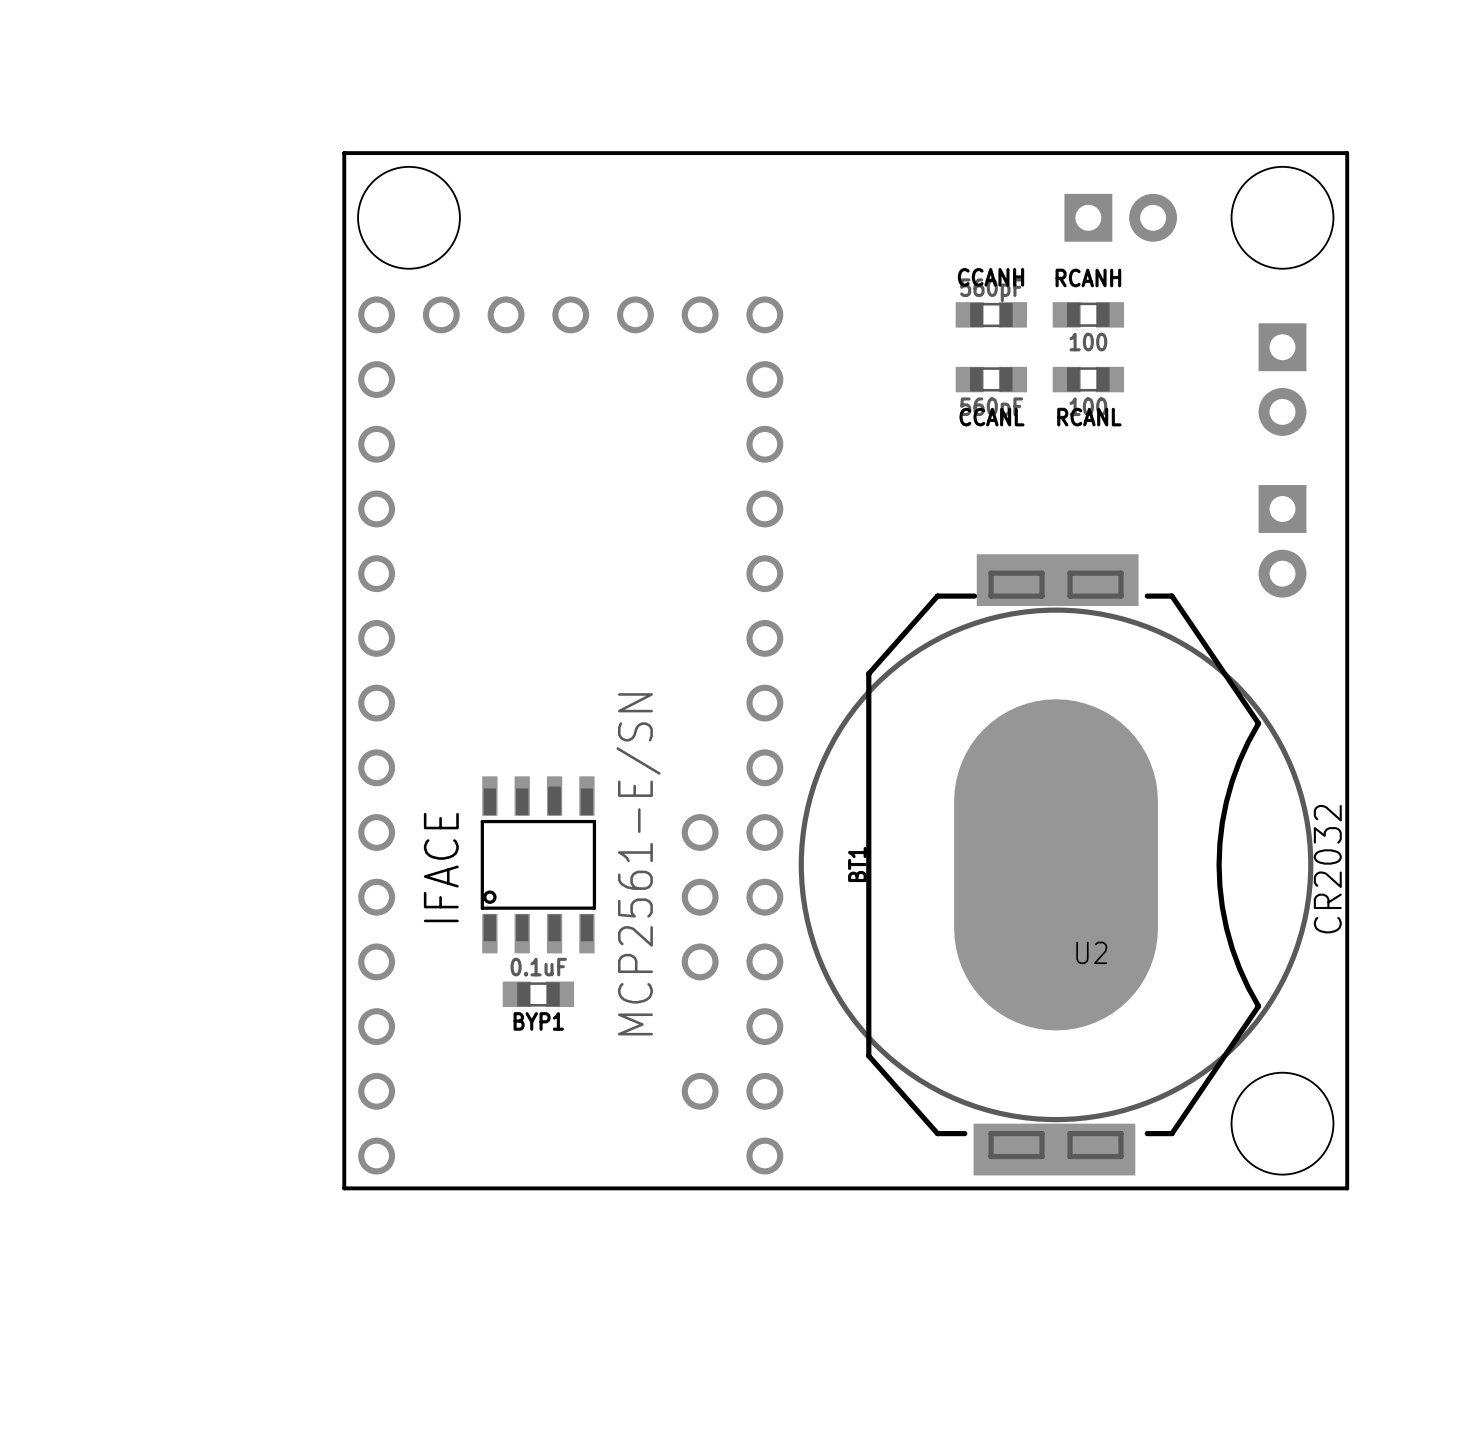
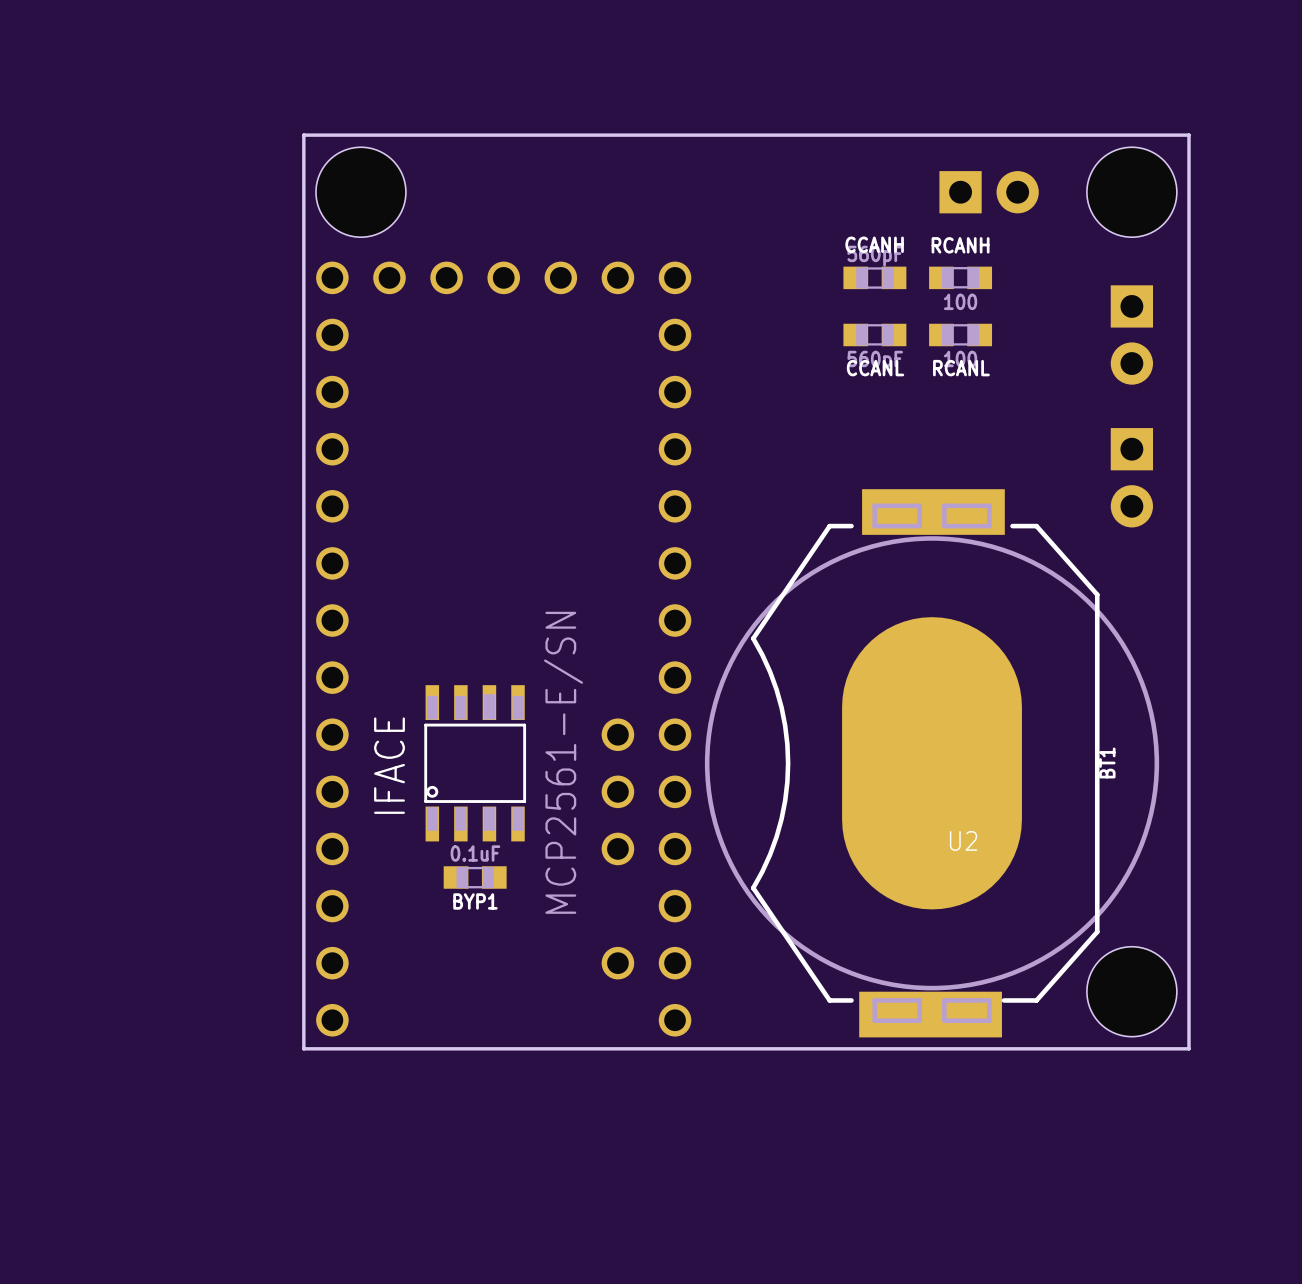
BT1 rotation: 0° (1056, 864) -> 180° (932, 763)
text: CR2032 (1327, 869) -> none

